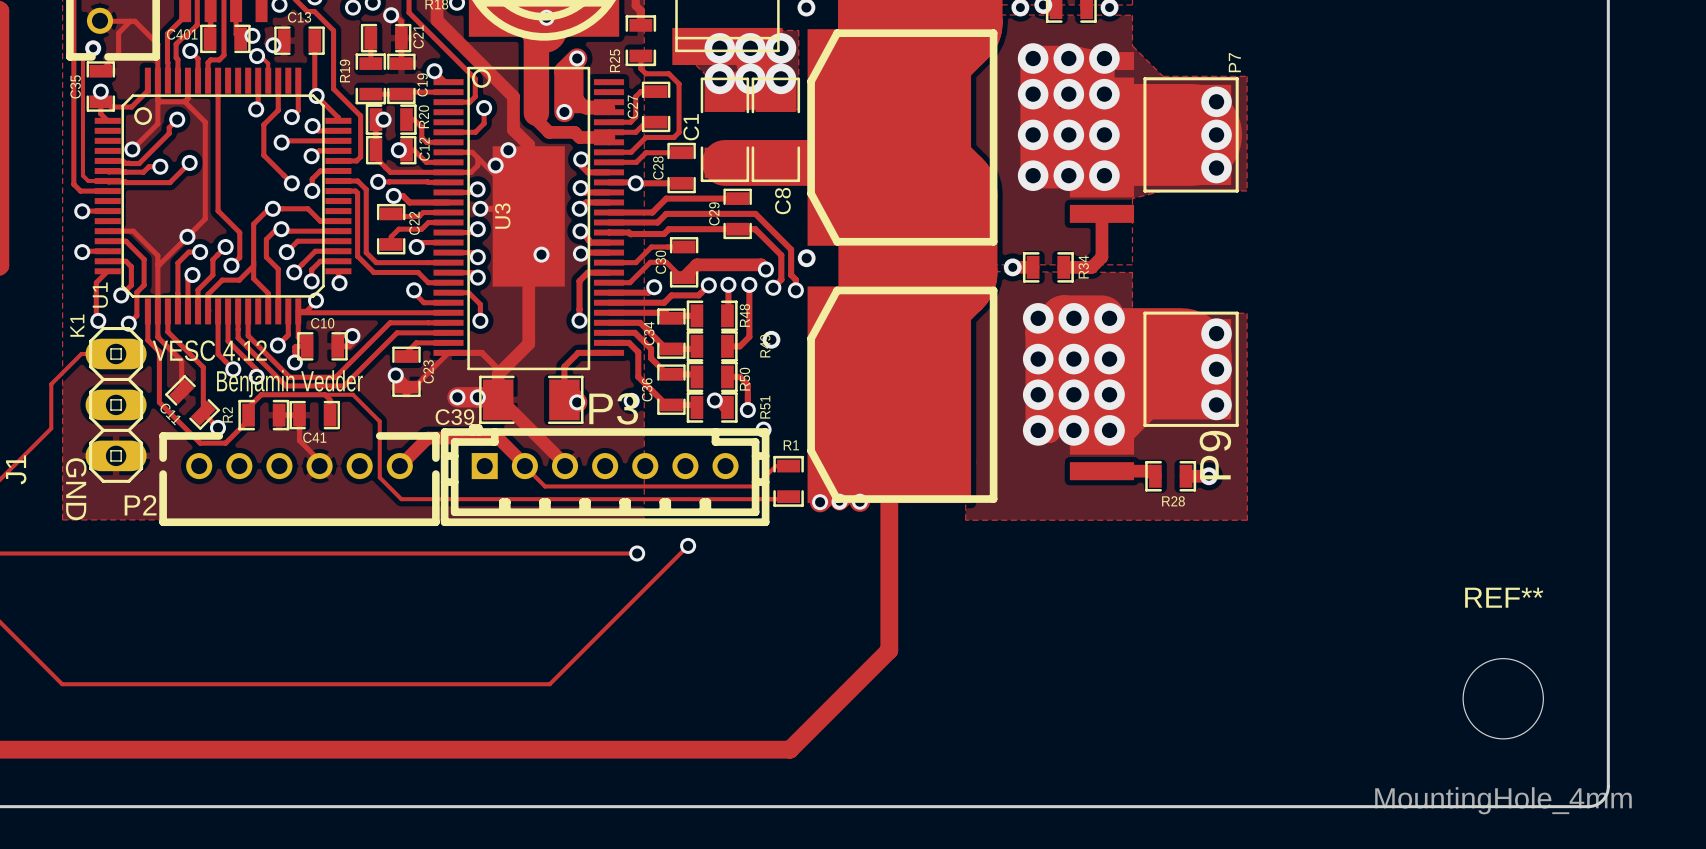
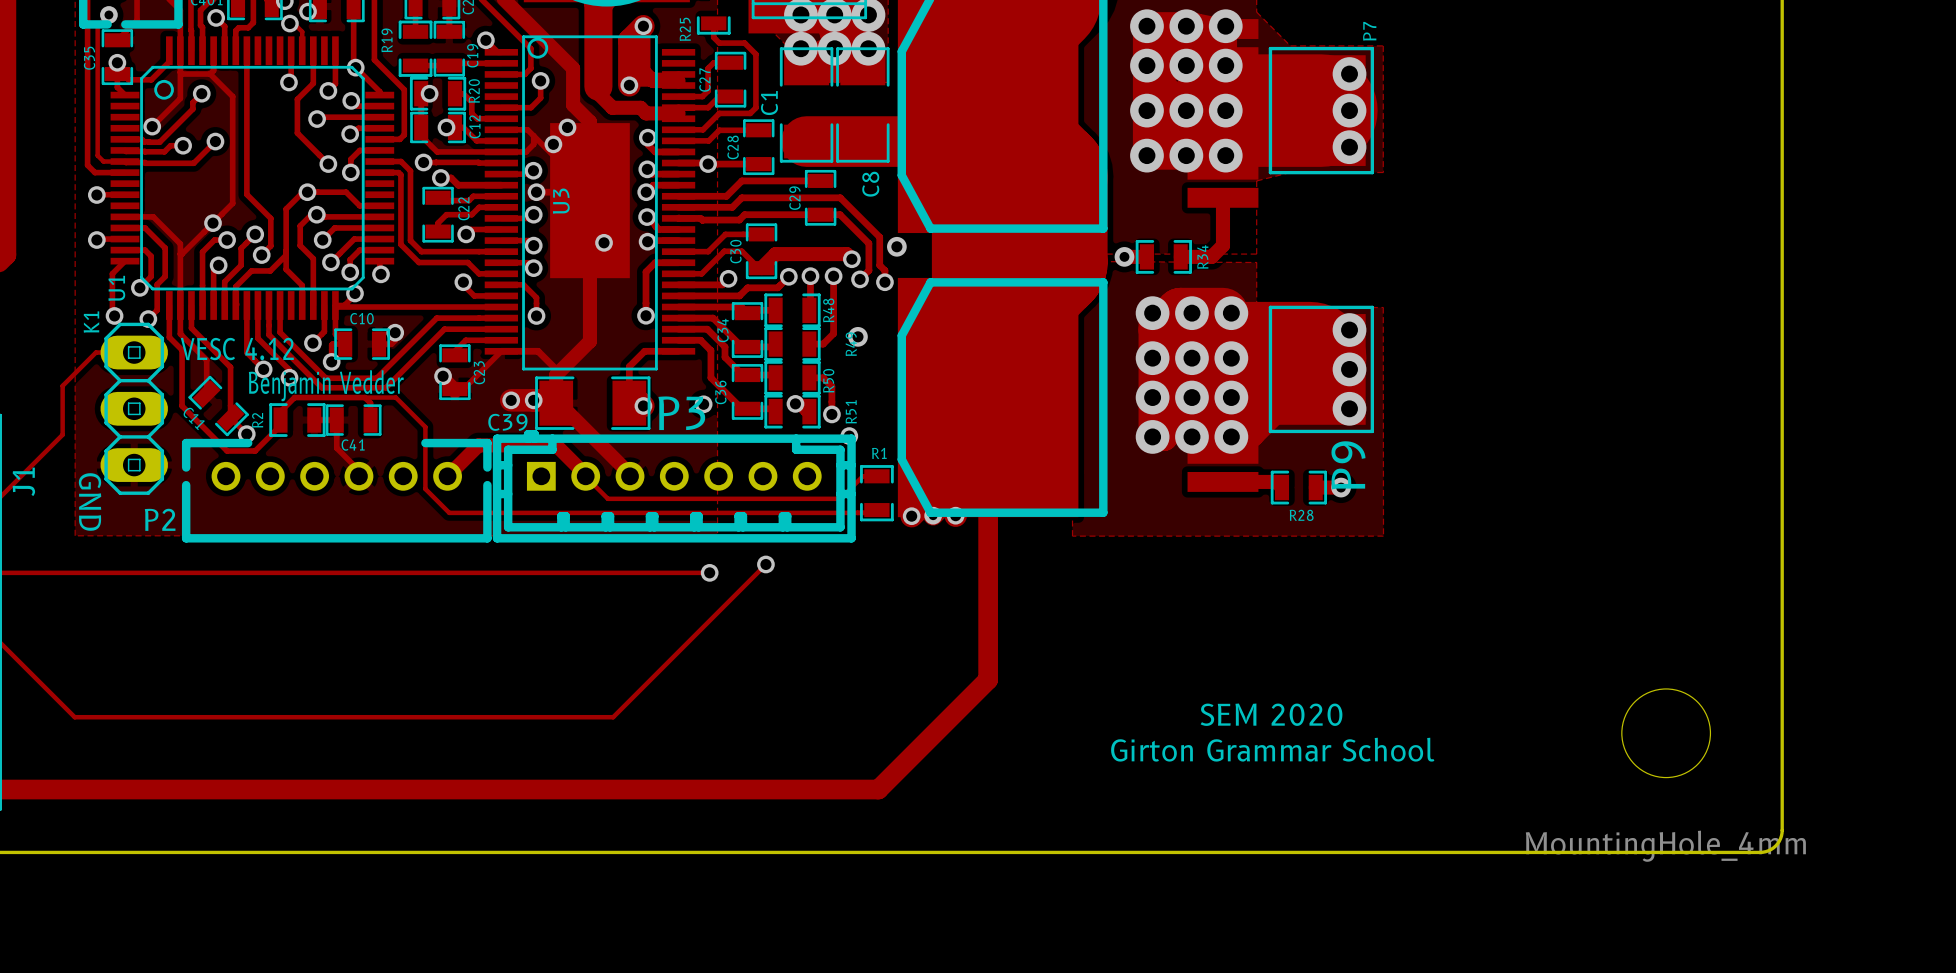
REF** name: REF** (1504, 597) -> none
text: none -> SEM 2020 (1271, 714)
text: none -> Girton Grammar School (1272, 749)

